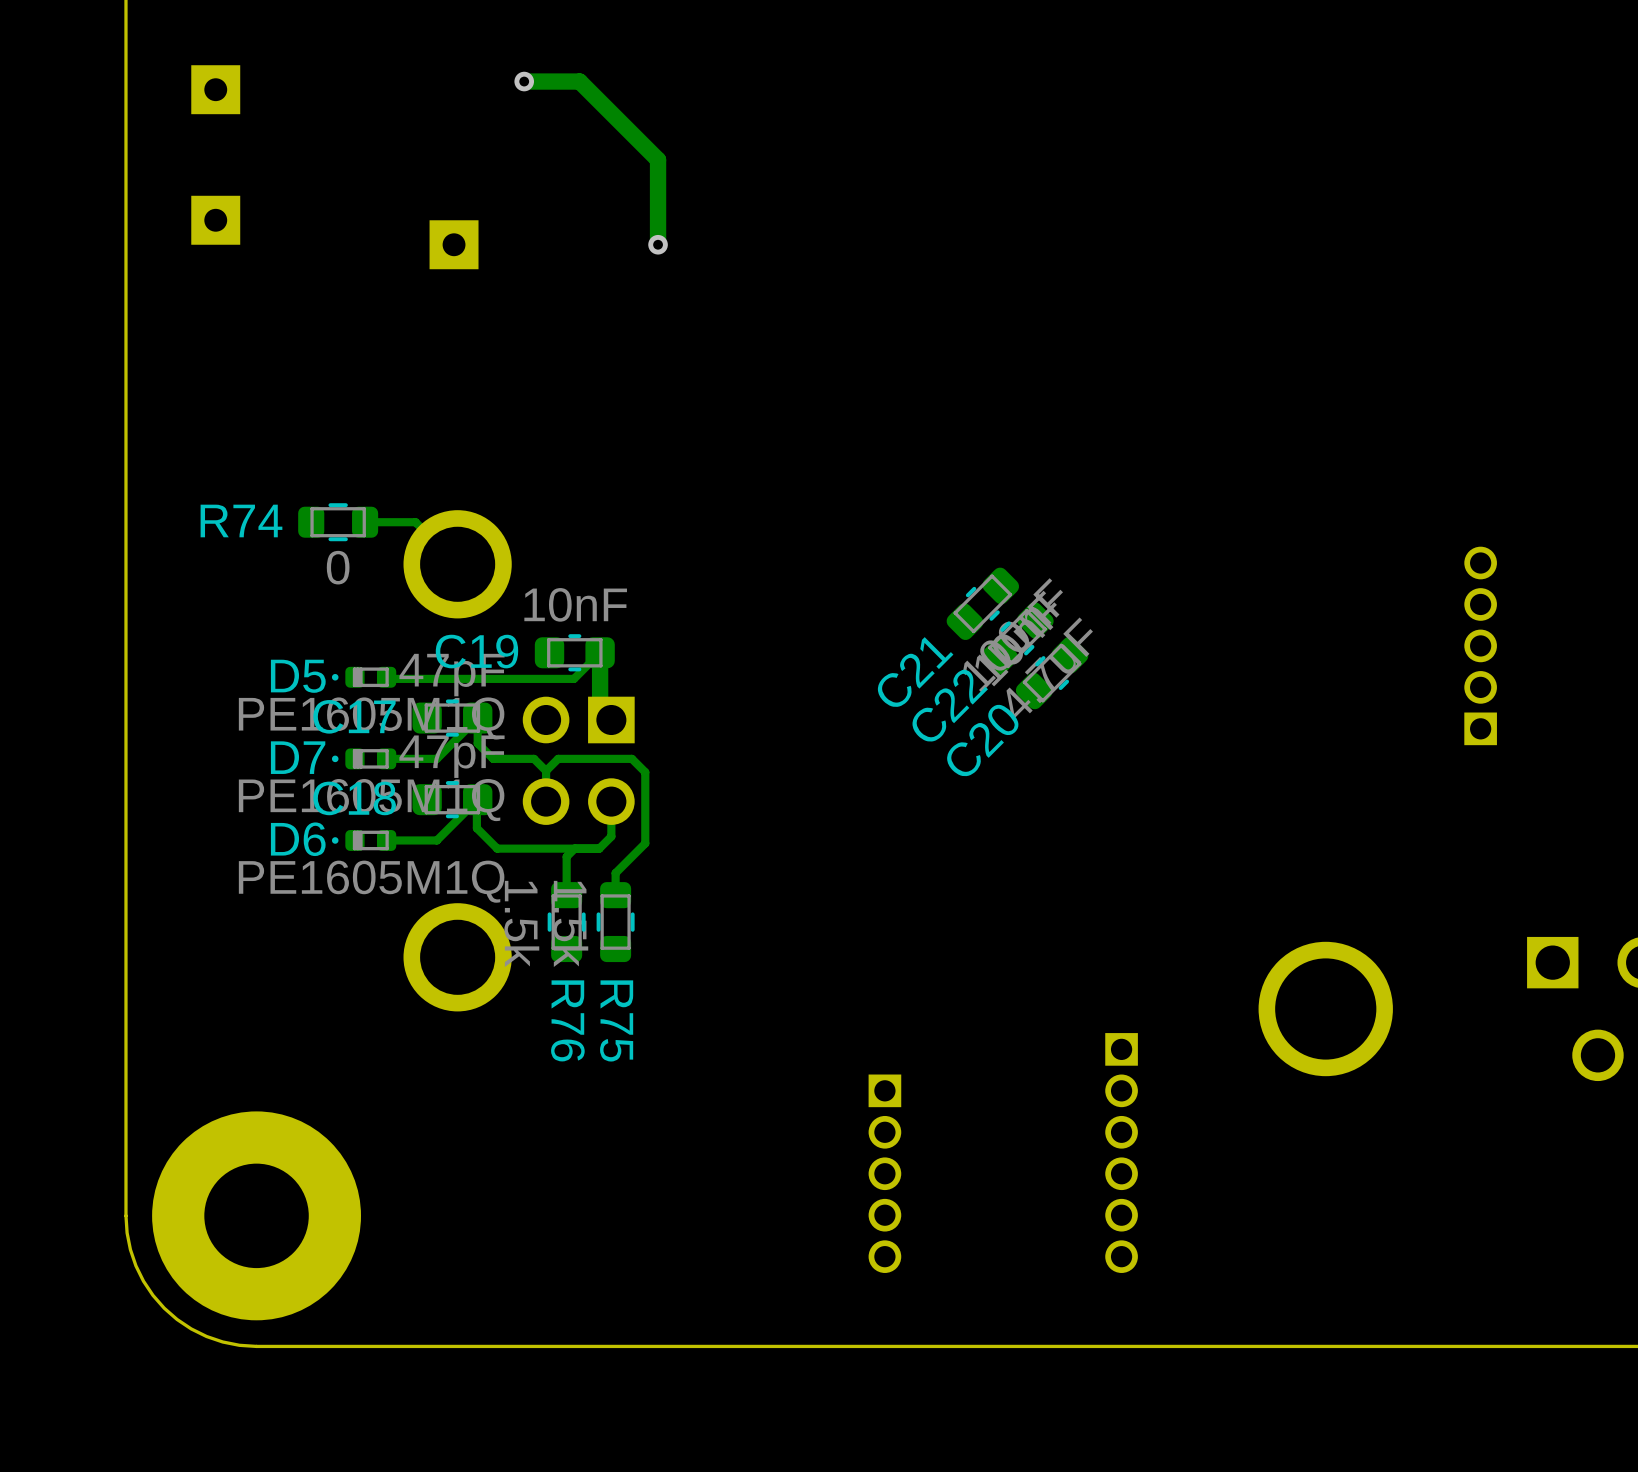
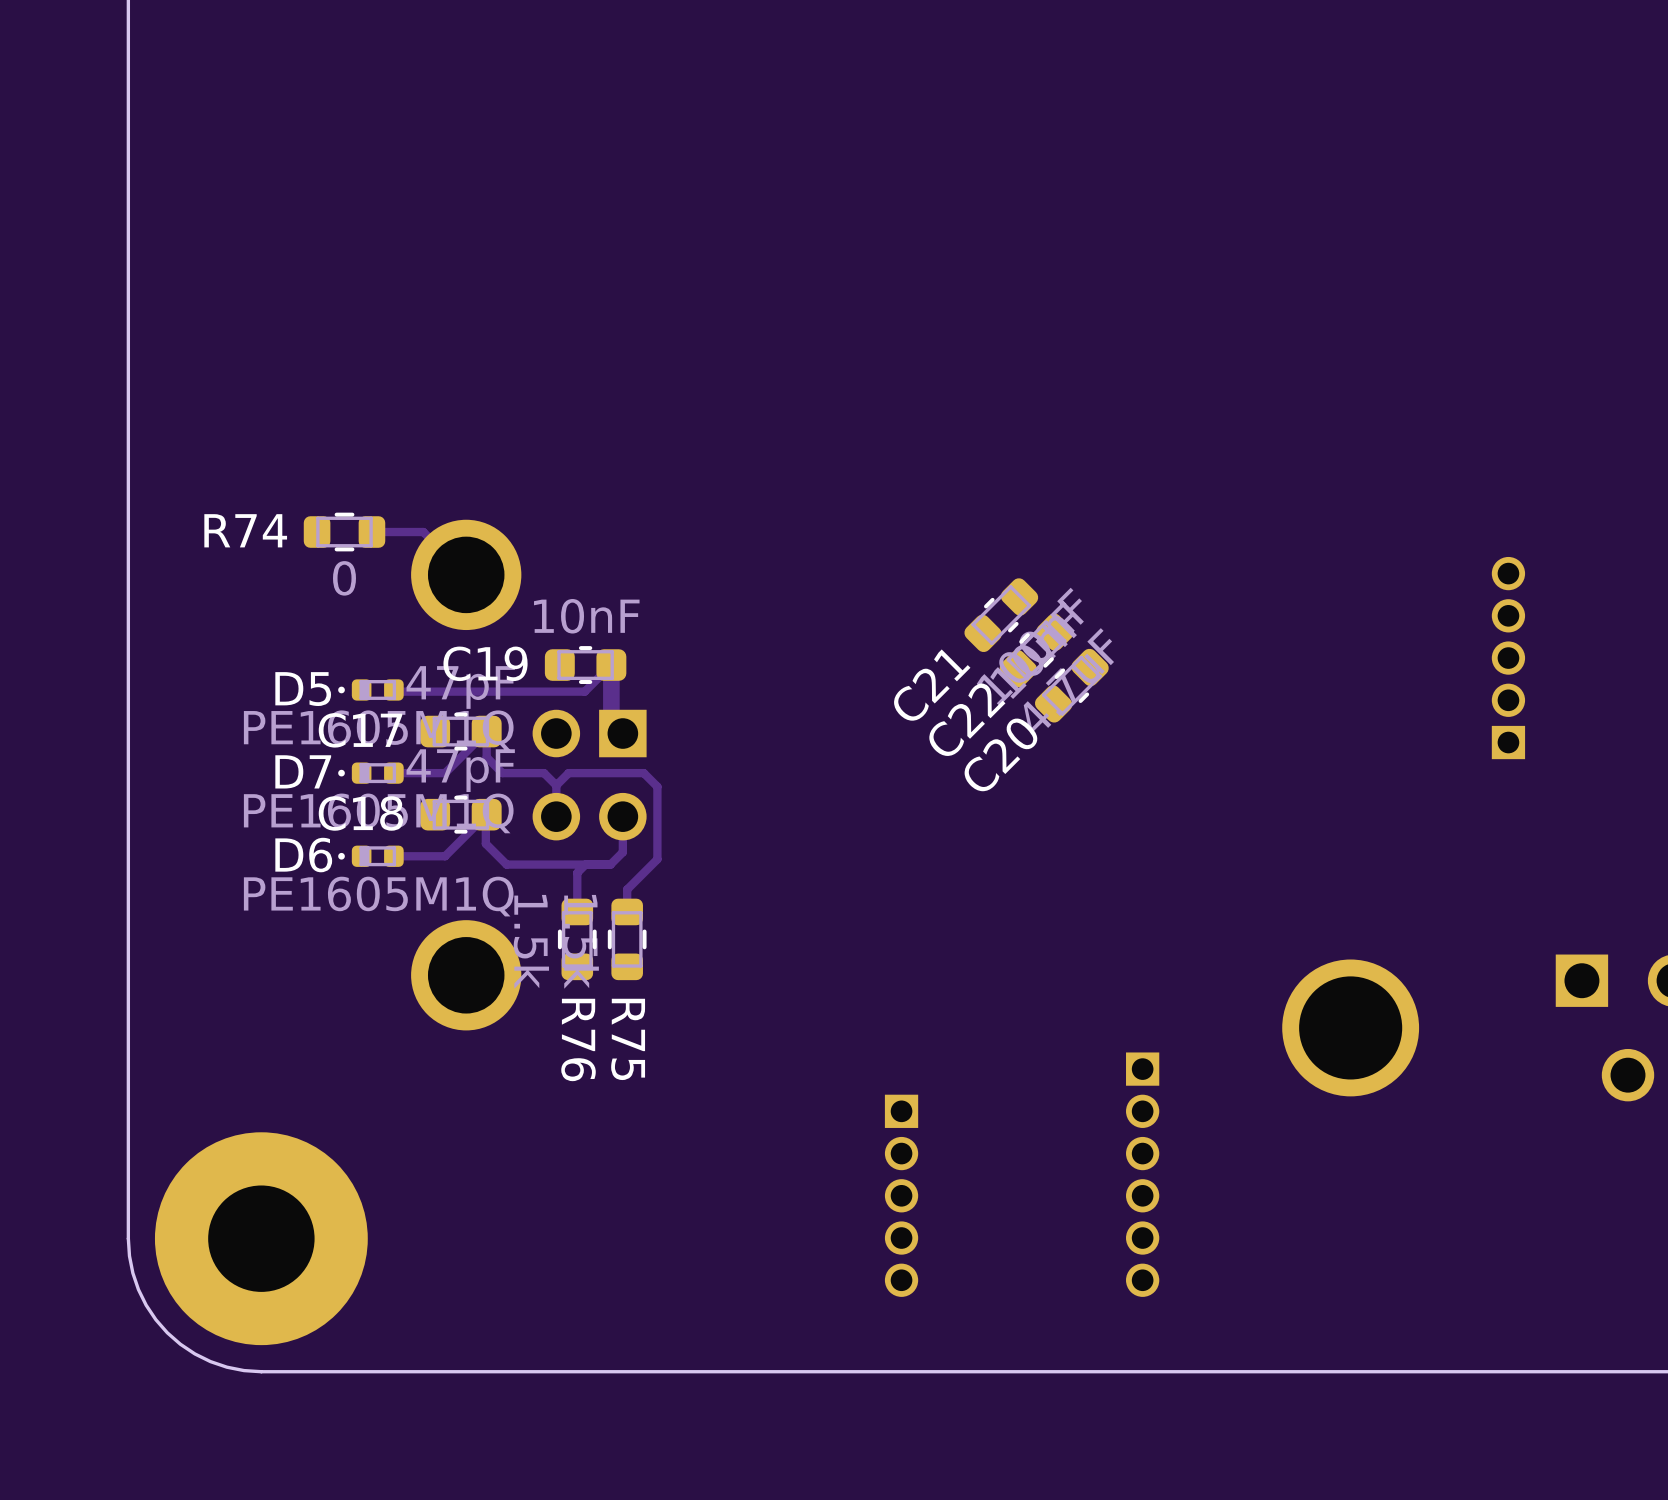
track: (524, 81) (579, 81) (658, 159) (658, 244) -> none
via: (524, 81) -> none
part: (215, 89) -> none
part: (215, 220) -> none
part: (454, 244) -> none
via: (658, 244) -> none

